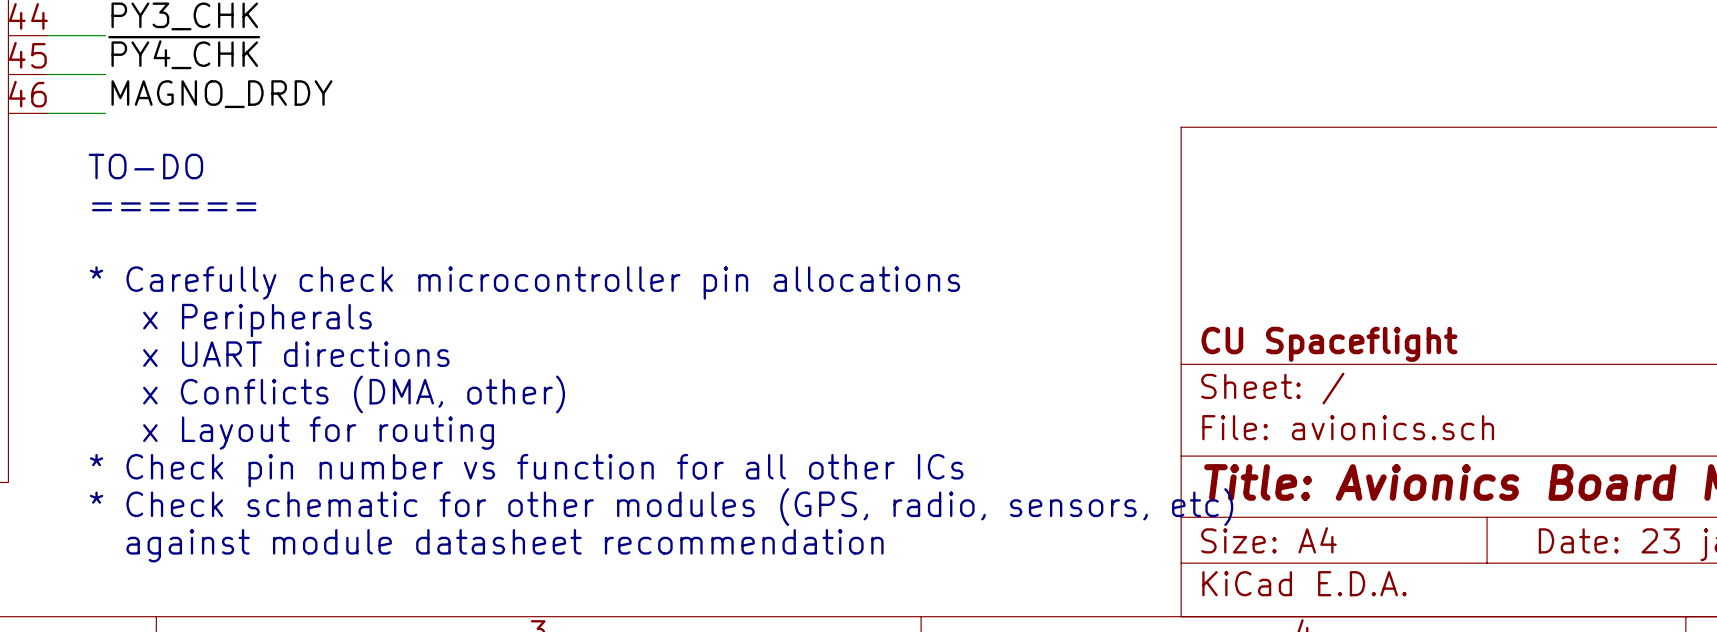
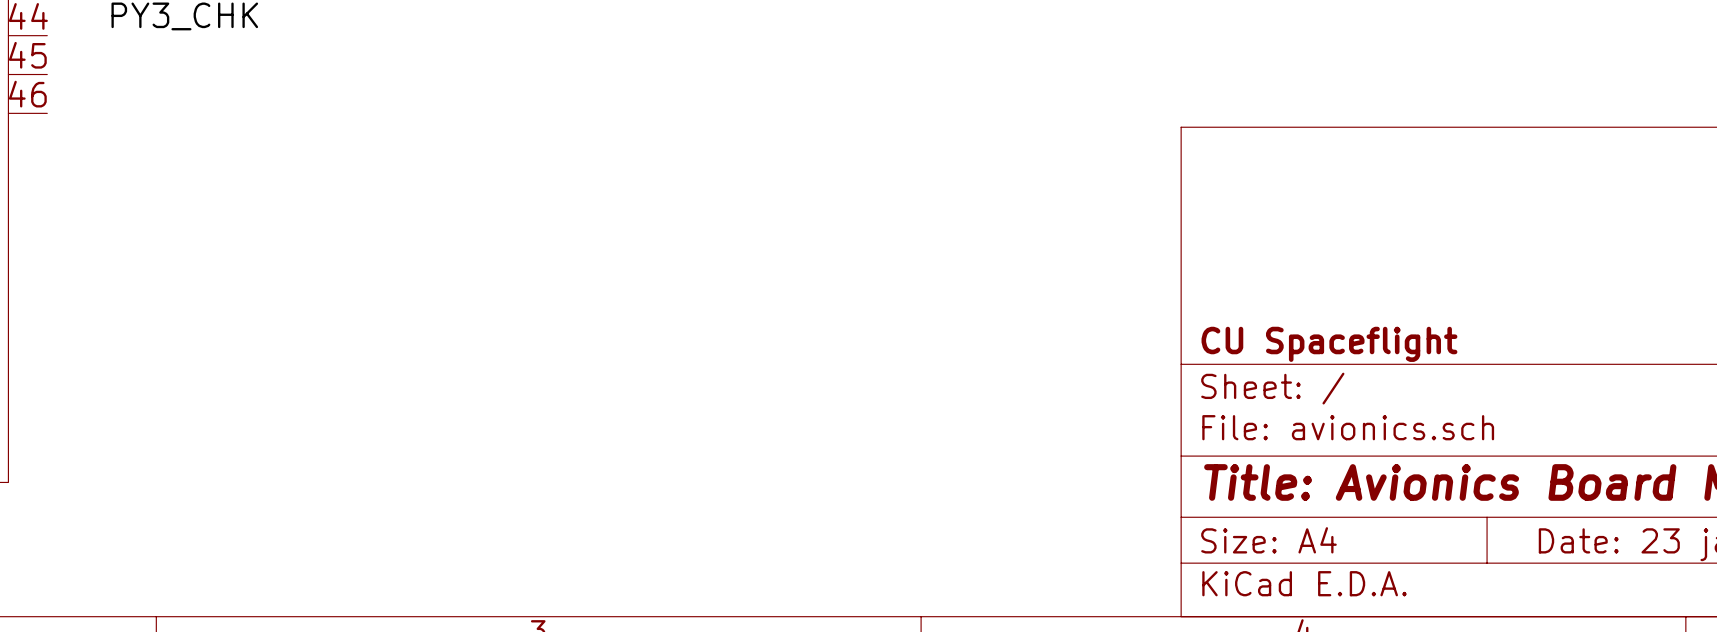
wire: (47, 35) (105, 35) -> none
label: ~{PY4_CHK} (184, 52) -> none
wire: (47, 74) (105, 74) -> none
label: MAGNO_DRDY (221, 94) -> none
wire: (47, 113) (105, 113) -> none
text: TO-DO (145, 166) -> none
text: ====== (174, 206) -> none
text: * Carefully check microcontroller pin allocations (524, 282) -> none
text: x Peripherals (257, 320) -> none
text: x UART directions (296, 354) -> none
text: x Conflicts (DMA, other) (354, 394) -> none
text: x Layout for routing (318, 433) -> none
text: * Check pin number vs function for all other ICs (526, 470) -> none
text: * Check schematic for other modules (GPS, radio, sensors, etc) (661, 507) -> none
text: against module datasheet recommendation (505, 545) -> none

